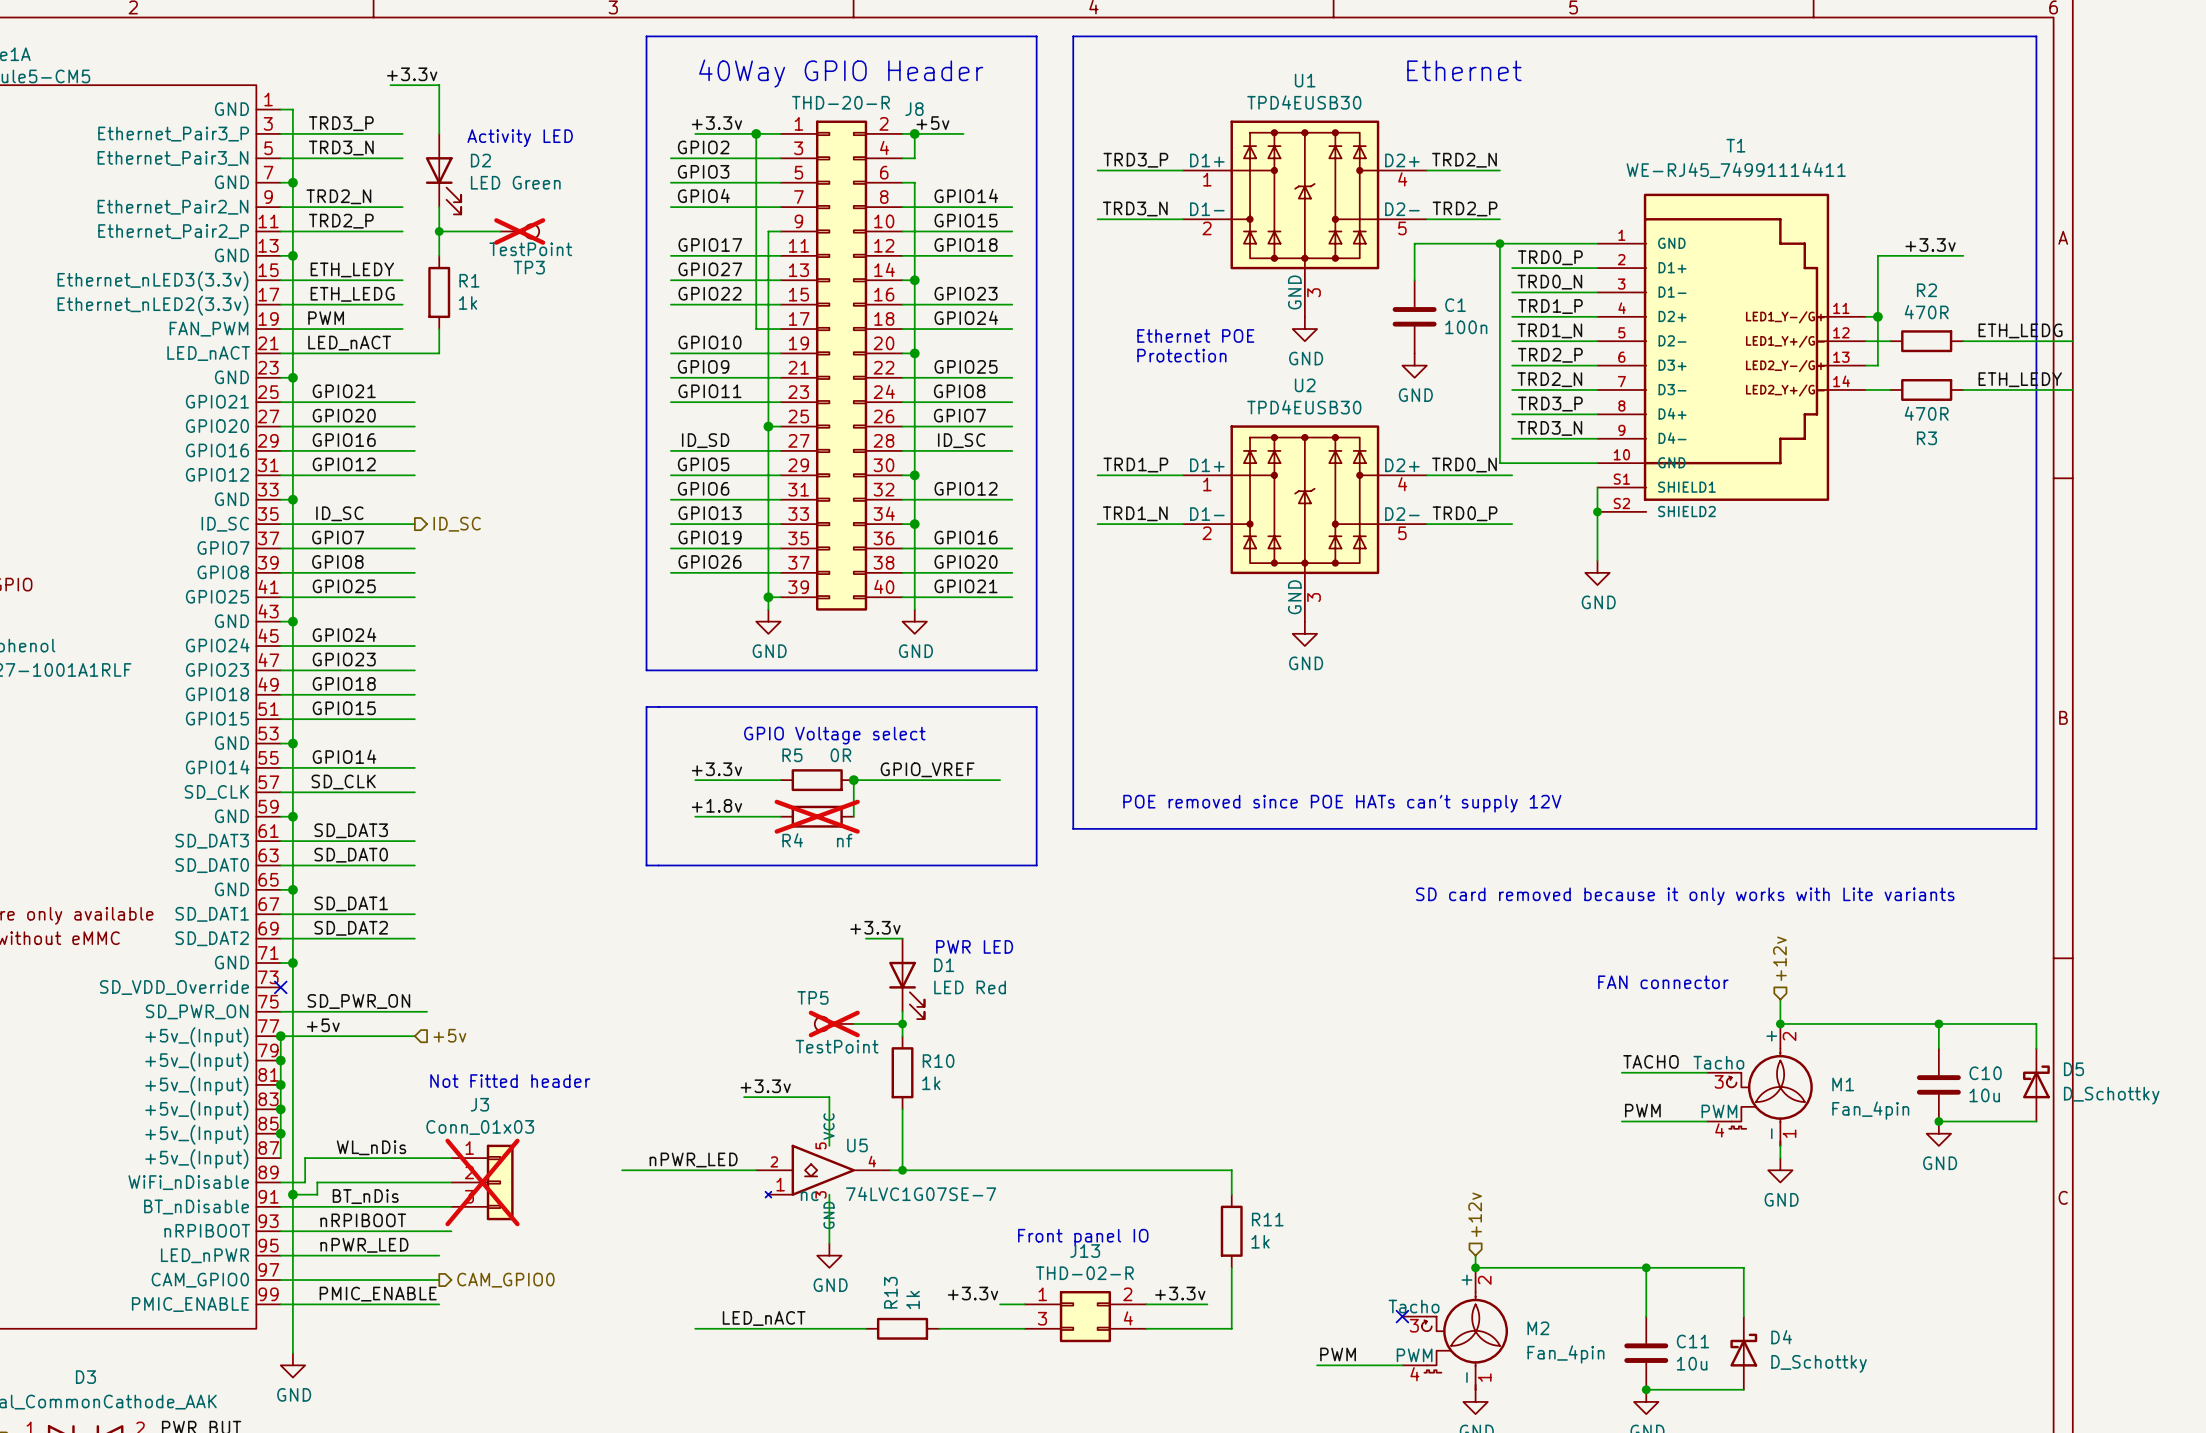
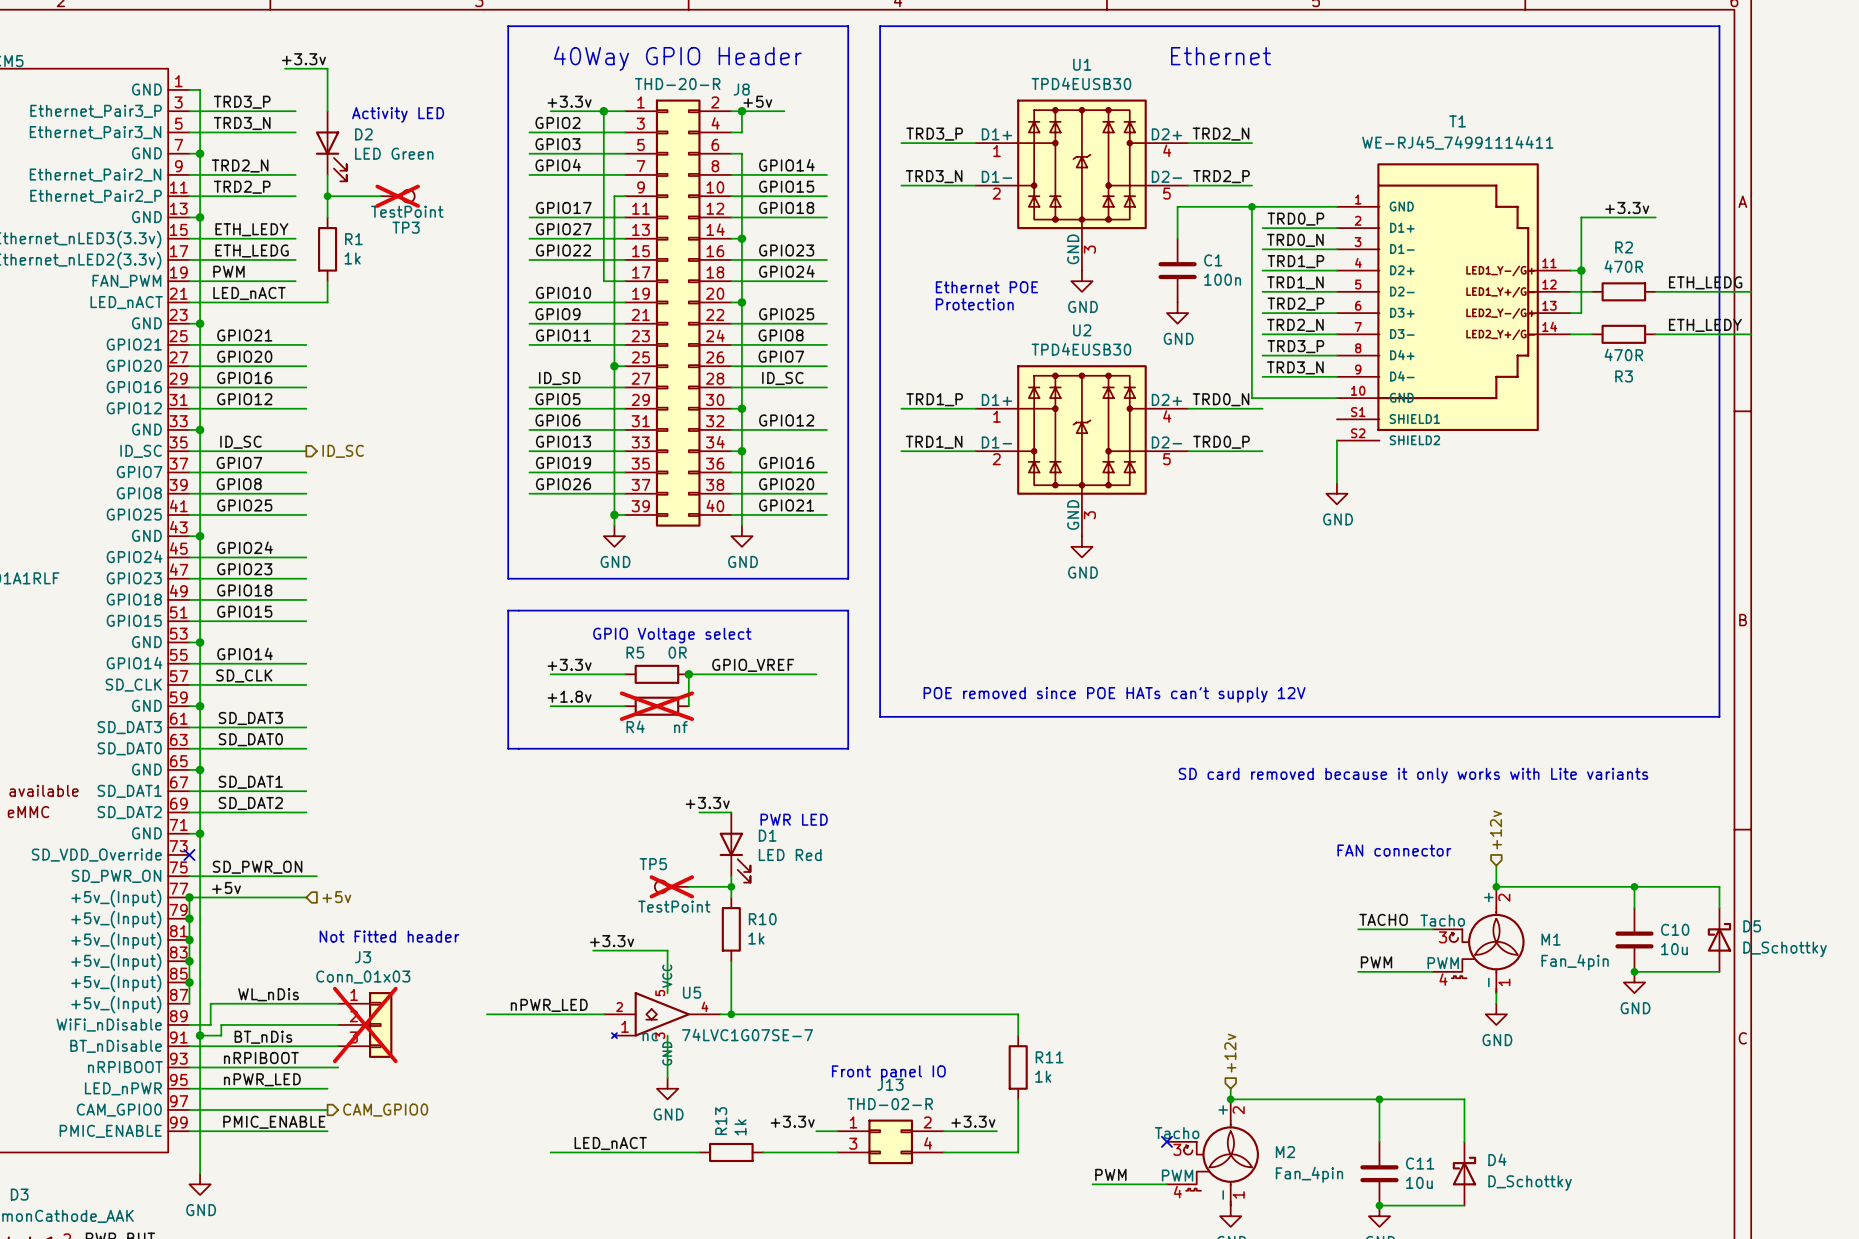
wire: (1597, 487) (1597, 511) -> none
junction: (1597, 511) -> none

